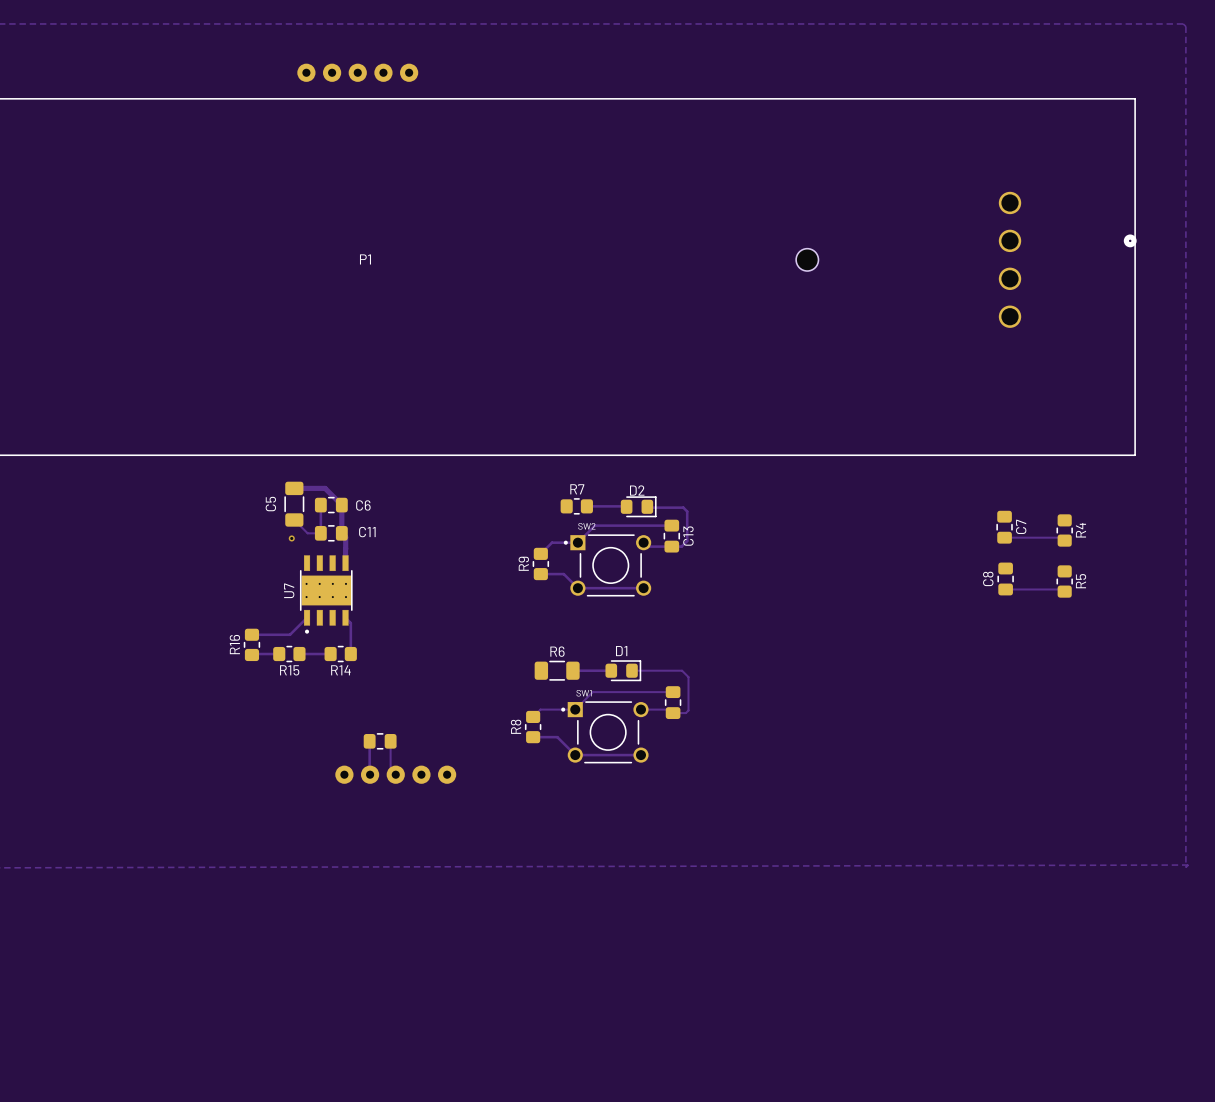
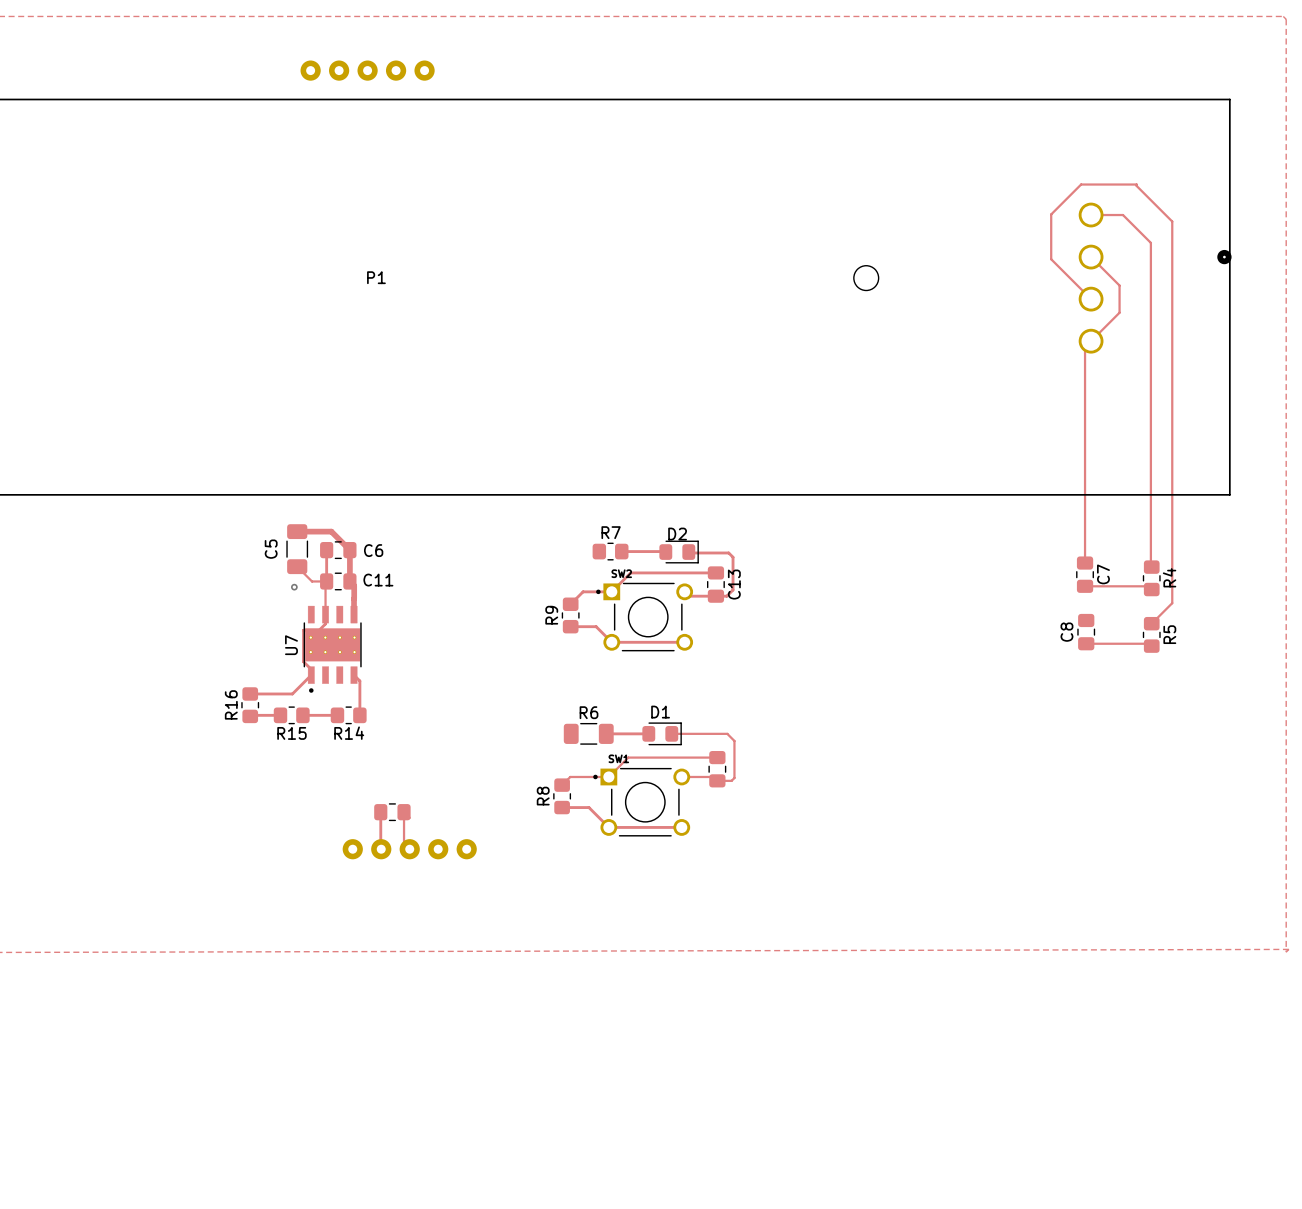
track: none -> (1091, 215) (1123, 215) (1150, 242) (1151, 567)
track: none -> (1091, 257) (1119, 285) (1119, 312) (1085, 347) (1085, 563)
track: none -> (1091, 299) (1051, 259) (1051, 214) (1081, 184) (1136, 184) (1172, 221) (1172, 603) (1151, 623)
track: none -> (325, 582) (325, 623) (319, 630) (303, 630) (303, 661) (311, 669) (311, 675)

